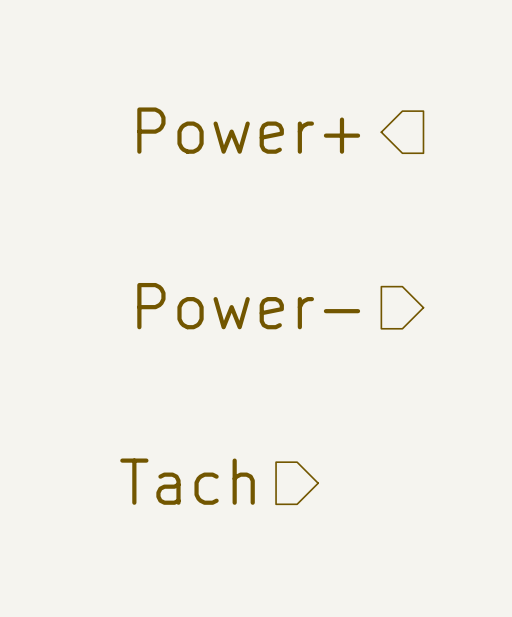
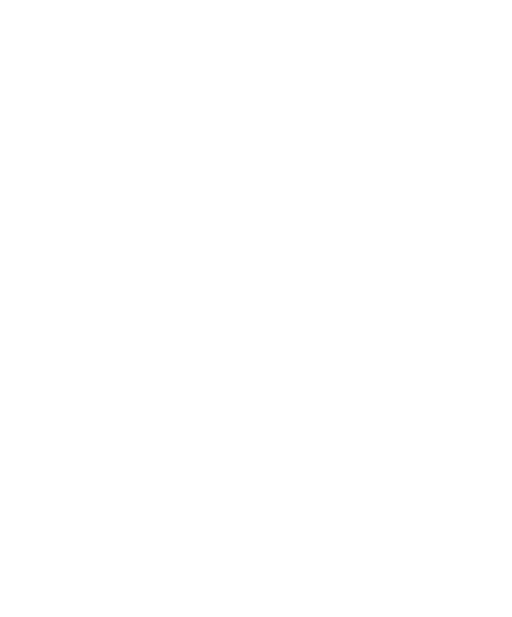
hierarchical label: Power+ (248, 130) -> none
hierarchical label: Power- (248, 306) -> none
hierarchical label: Tach (187, 481) -> none

